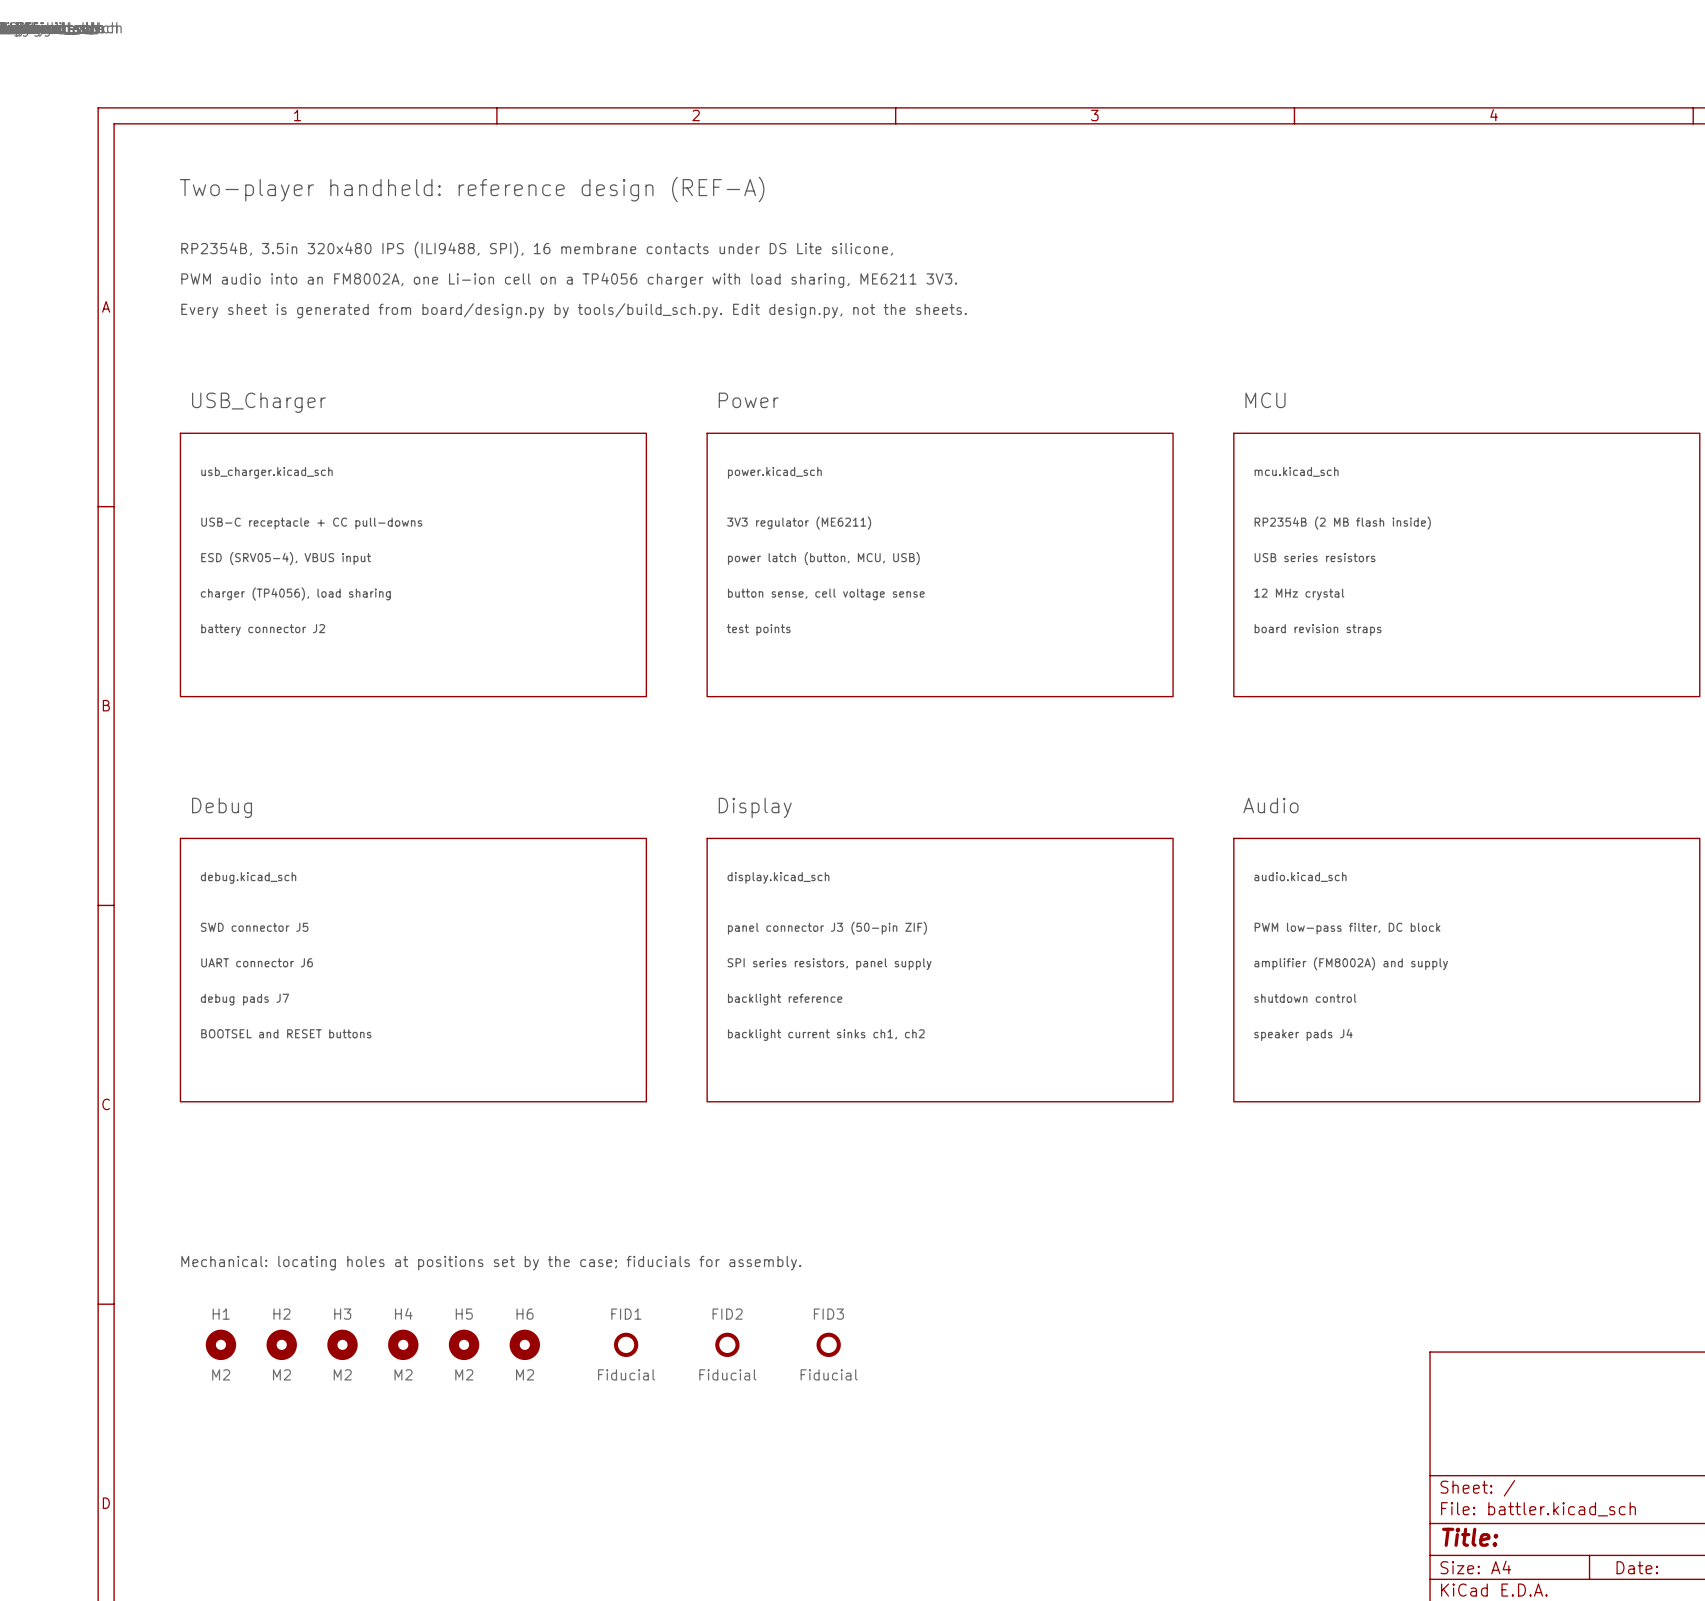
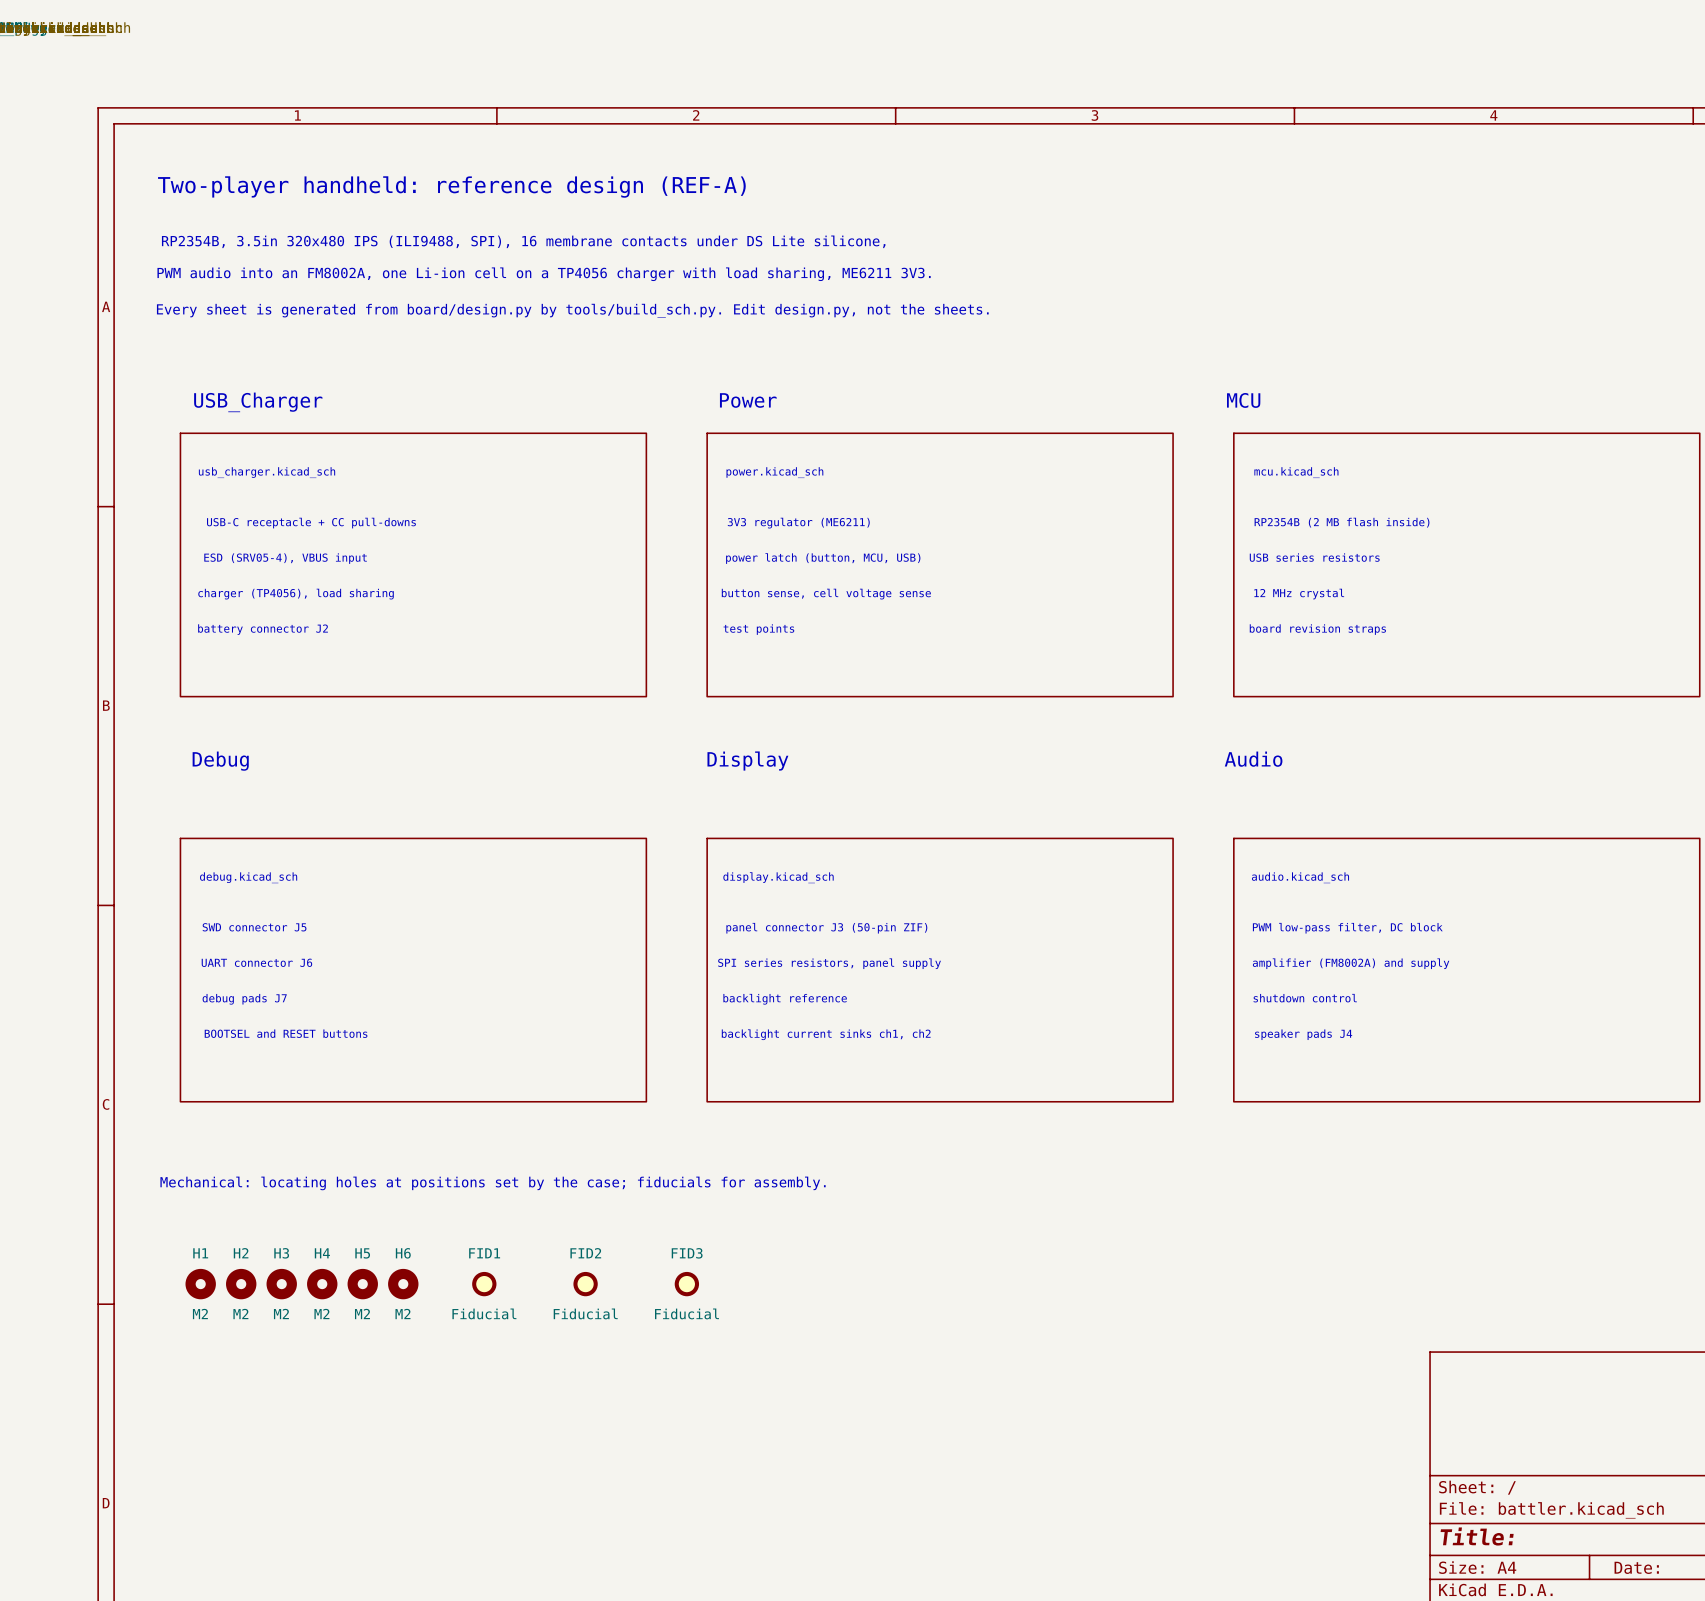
text position: Two-player handheld: reference design (REF-A) (472, 189) -> Two-player handheld: reference design (REF-A) (451, 187)
text position: RP2354B, 3.5in 320x480 IPS (ILI9488, SPI), 16 membrane contacts under DS Lite silicone, (537, 249) -> RP2354B, 3.5in 320x480 IPS (ILI9488, SPI), 16 membrane contacts under DS Lite silicone, (523, 241)
text position: PWM audio into an FM8002A, one Li-ion cell on a TP4056 charger with load sharing, ME6211 3V3. (569, 280) -> PWM audio into an FM8002A, one Li-ion cell on a TP4056 charger with load sharing, ME6211 3V3. (544, 274)
text position: MCU (1265, 400) -> MCU (1243, 400)
text position: Audio (1270, 805) -> Audio (1253, 759)
text position: Debug (222, 807) -> Debug (220, 761)
text position: Display (755, 807) -> Display (747, 761)
text position: Mechanical: locating holes at positions set by the case; fiducials for assembly. (491, 1263) -> Mechanical: locating holes at positions set by the case; fiducials for assembly. (493, 1183)
H1 position: (220, 1344) -> (200, 1284)
H2 position: (281, 1344) -> (241, 1284)
H3 position: (342, 1344) -> (281, 1284)
H4 position: (403, 1344) -> (322, 1284)
H5 position: (464, 1344) -> (362, 1284)
H6 position: (524, 1344) -> (403, 1284)
FID1 position: (626, 1344) -> (484, 1284)
FID2 position: (727, 1344) -> (585, 1284)
FID3 position: (828, 1344) -> (686, 1284)

